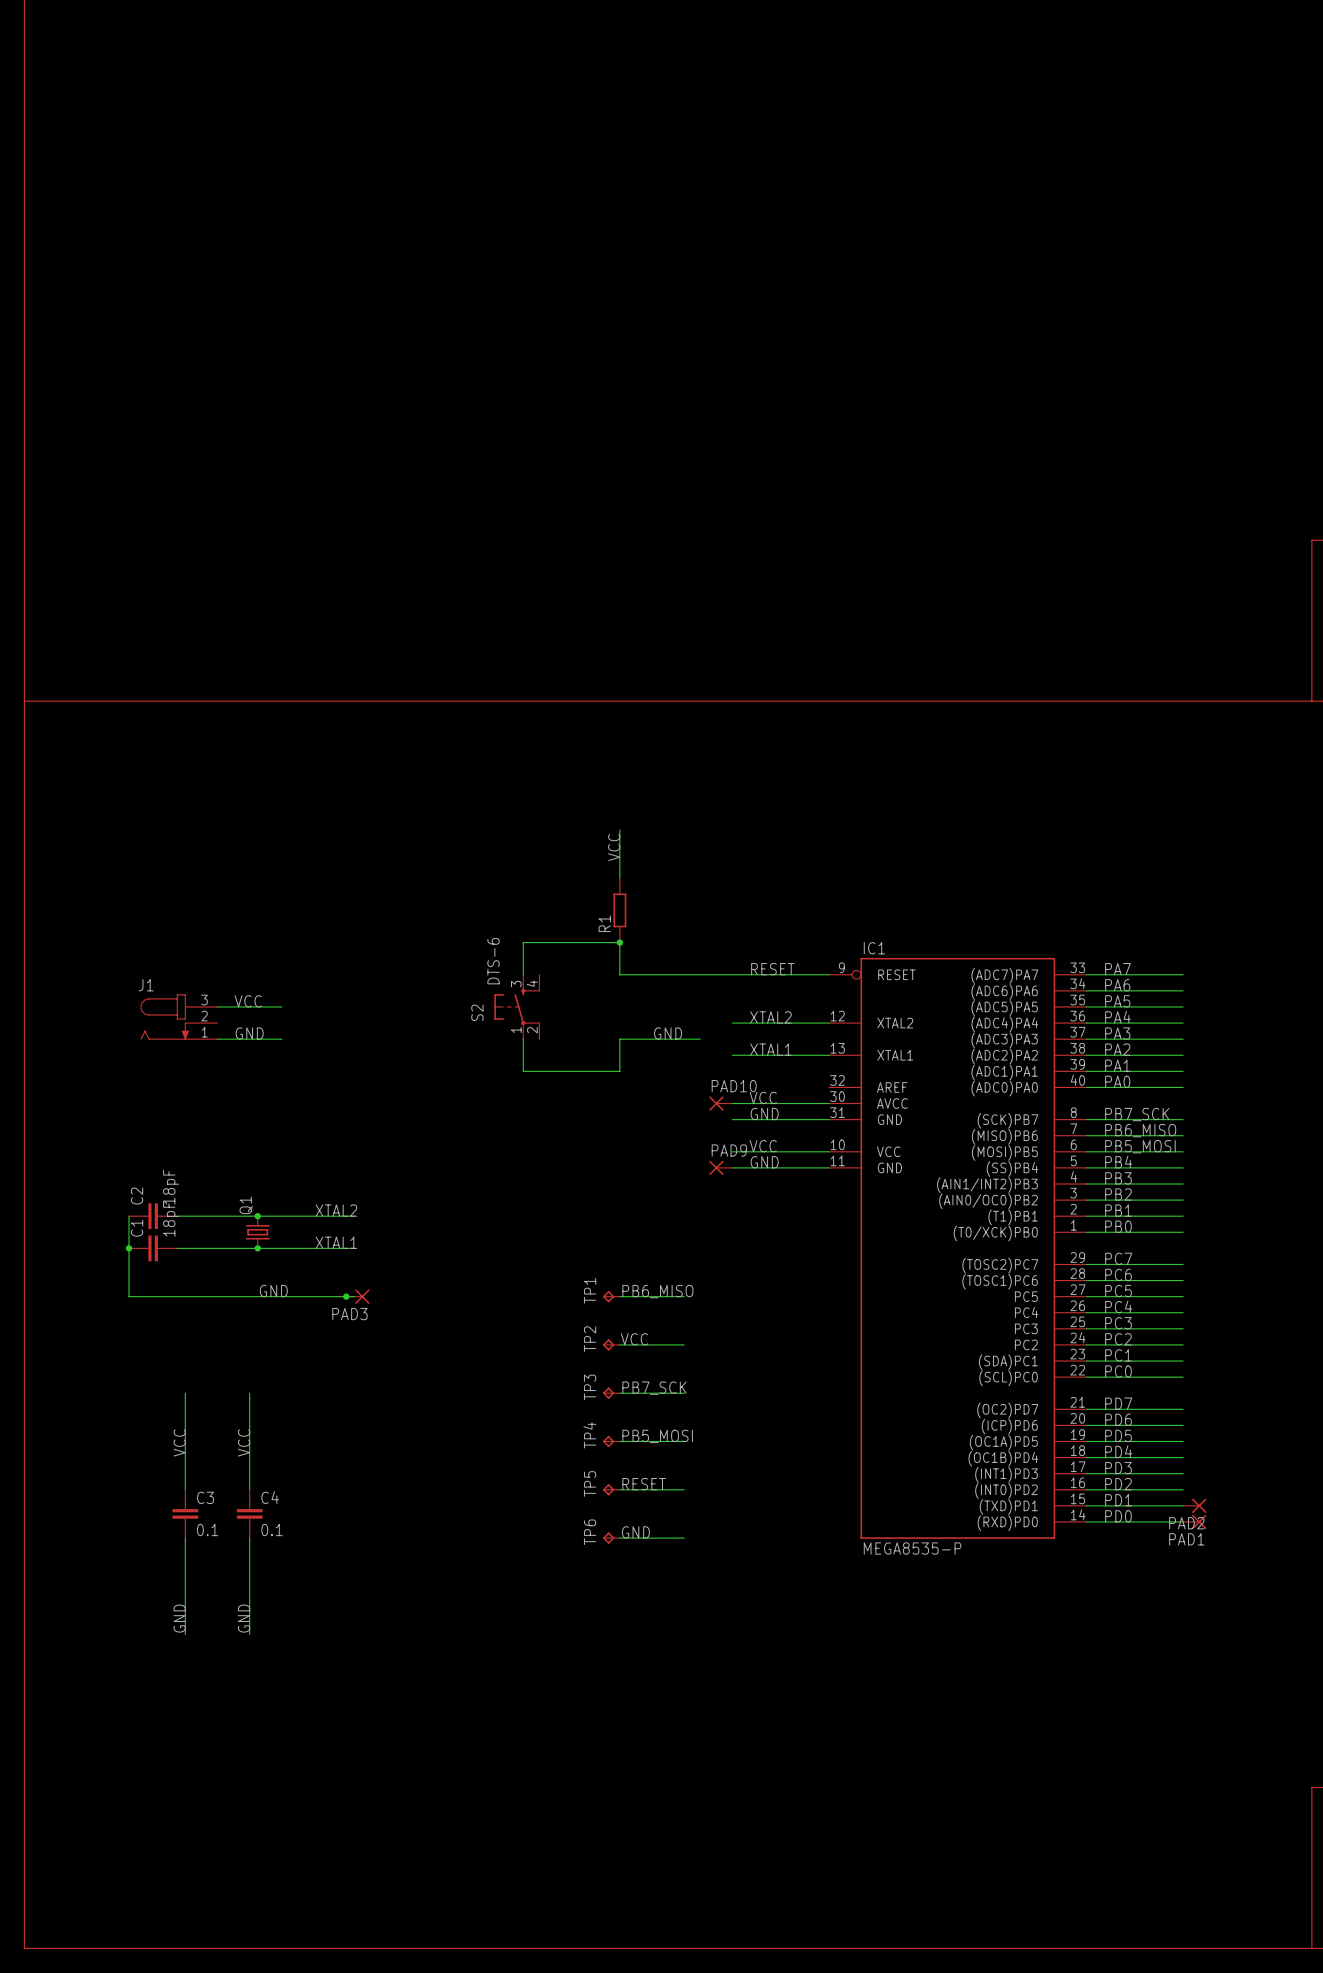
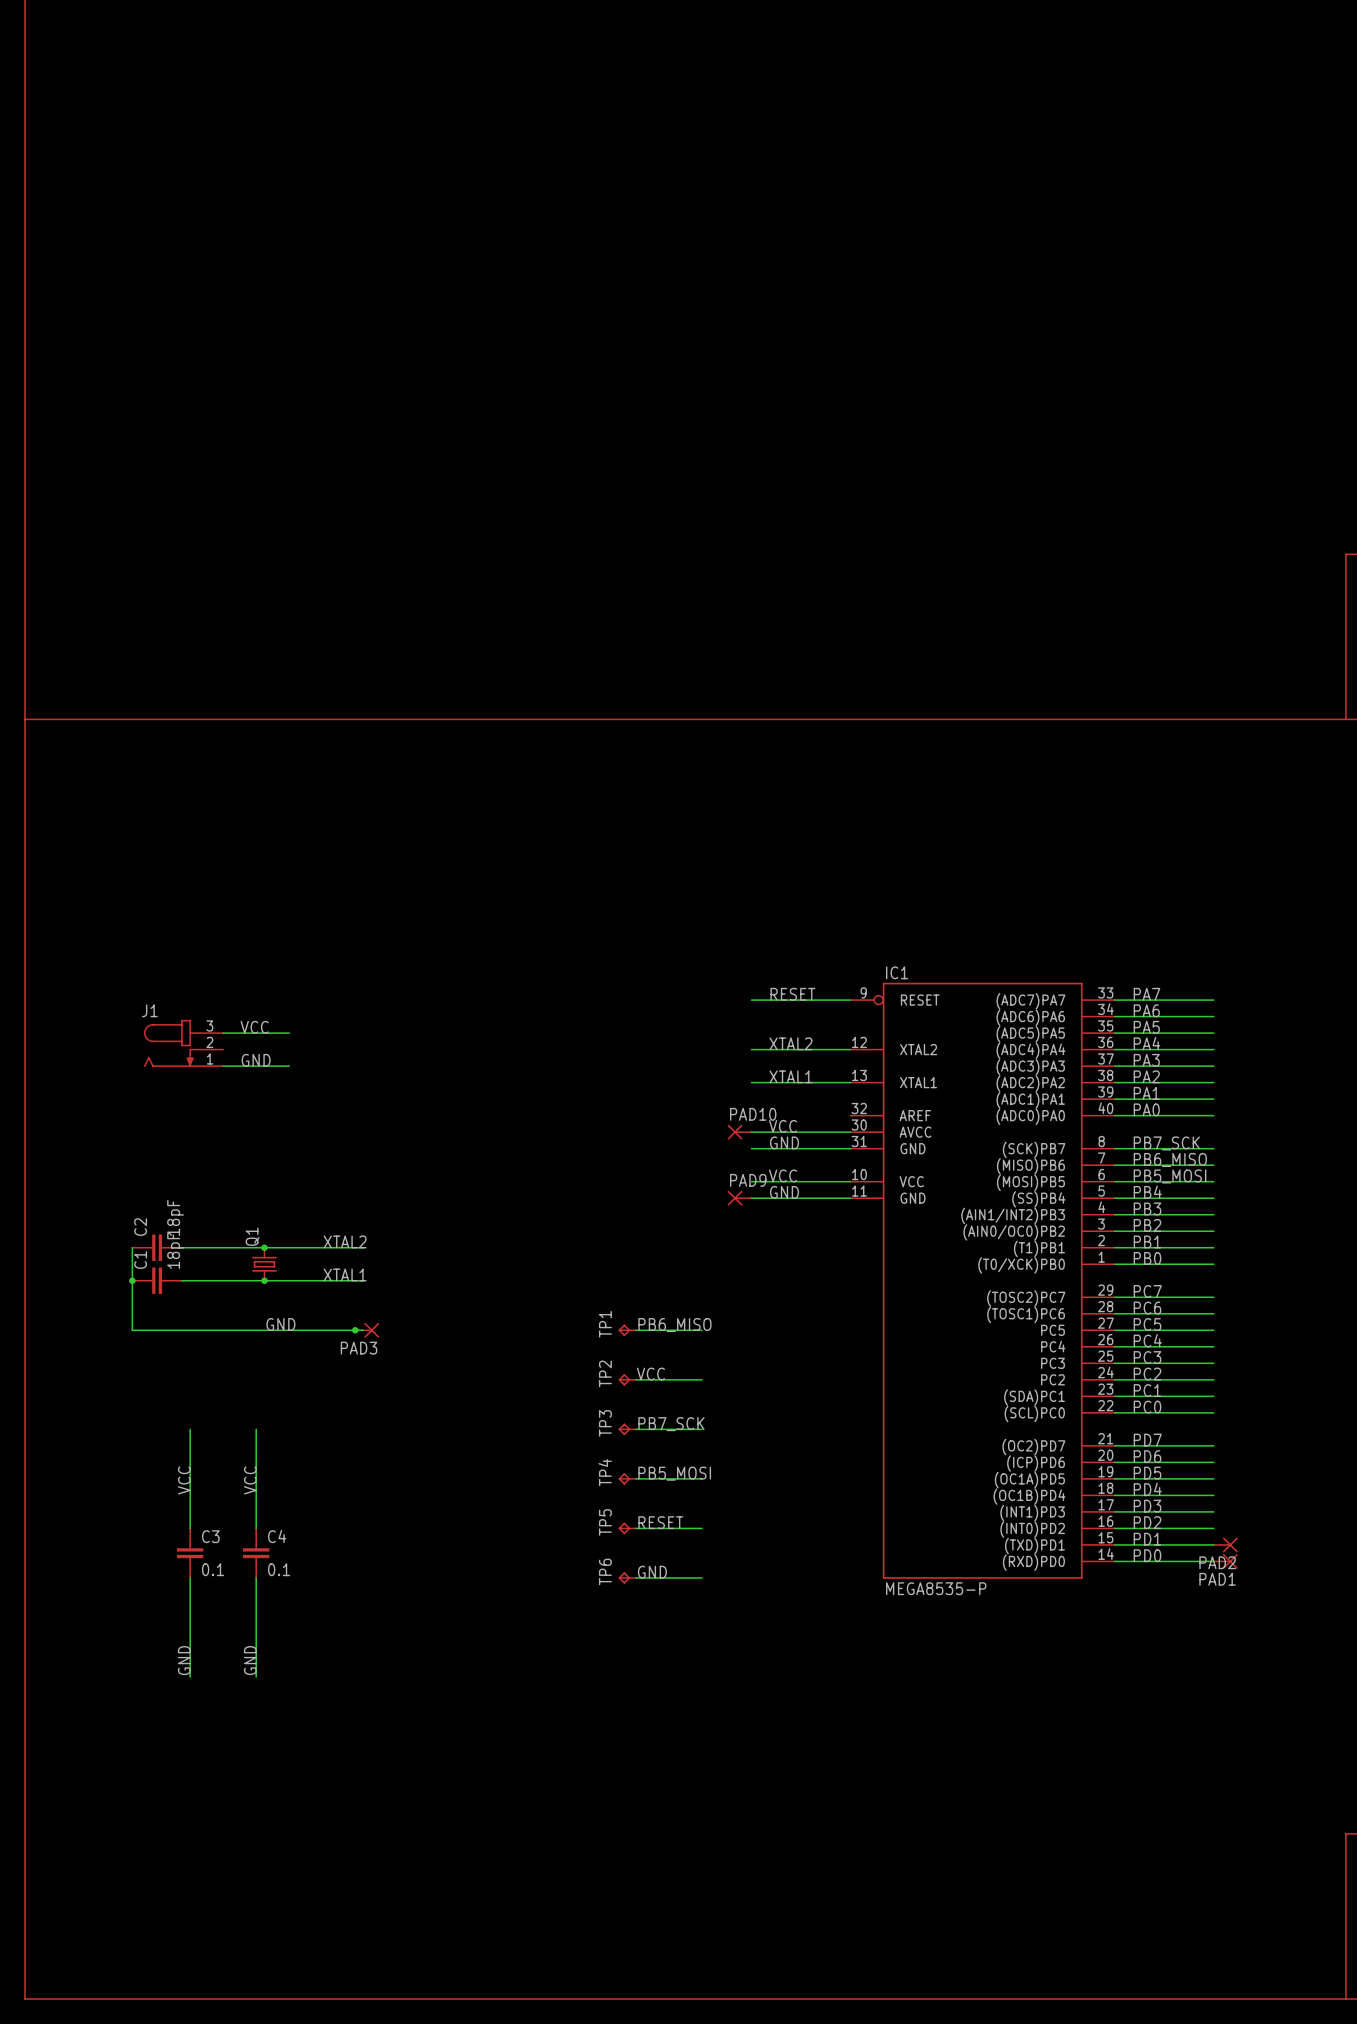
wire: (619, 829) (619, 878) -> none
label: VCC (614, 847) -> none
R1: (619, 910) -> none
junction: (619, 942) -> none
wire: (523, 974) (523, 942) (619, 942) (619, 974) (732, 974) -> none
S2: DTS-6 (517, 1006) -> none
label: GND (668, 1033) -> none
wire: (523, 1039) (523, 1071) (619, 1071) (619, 1039) (700, 1039) -> none

